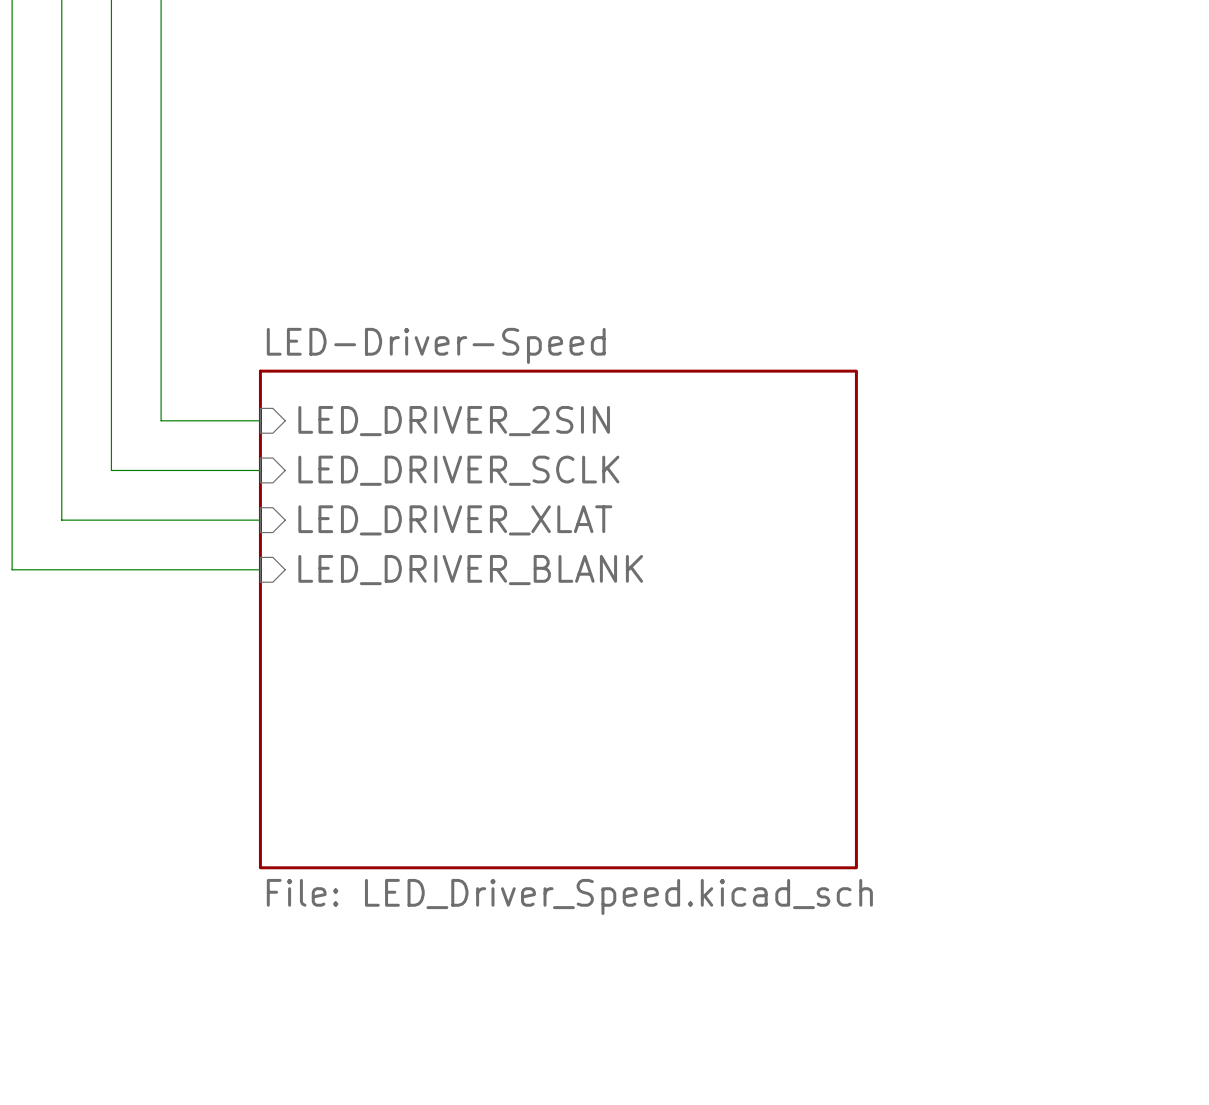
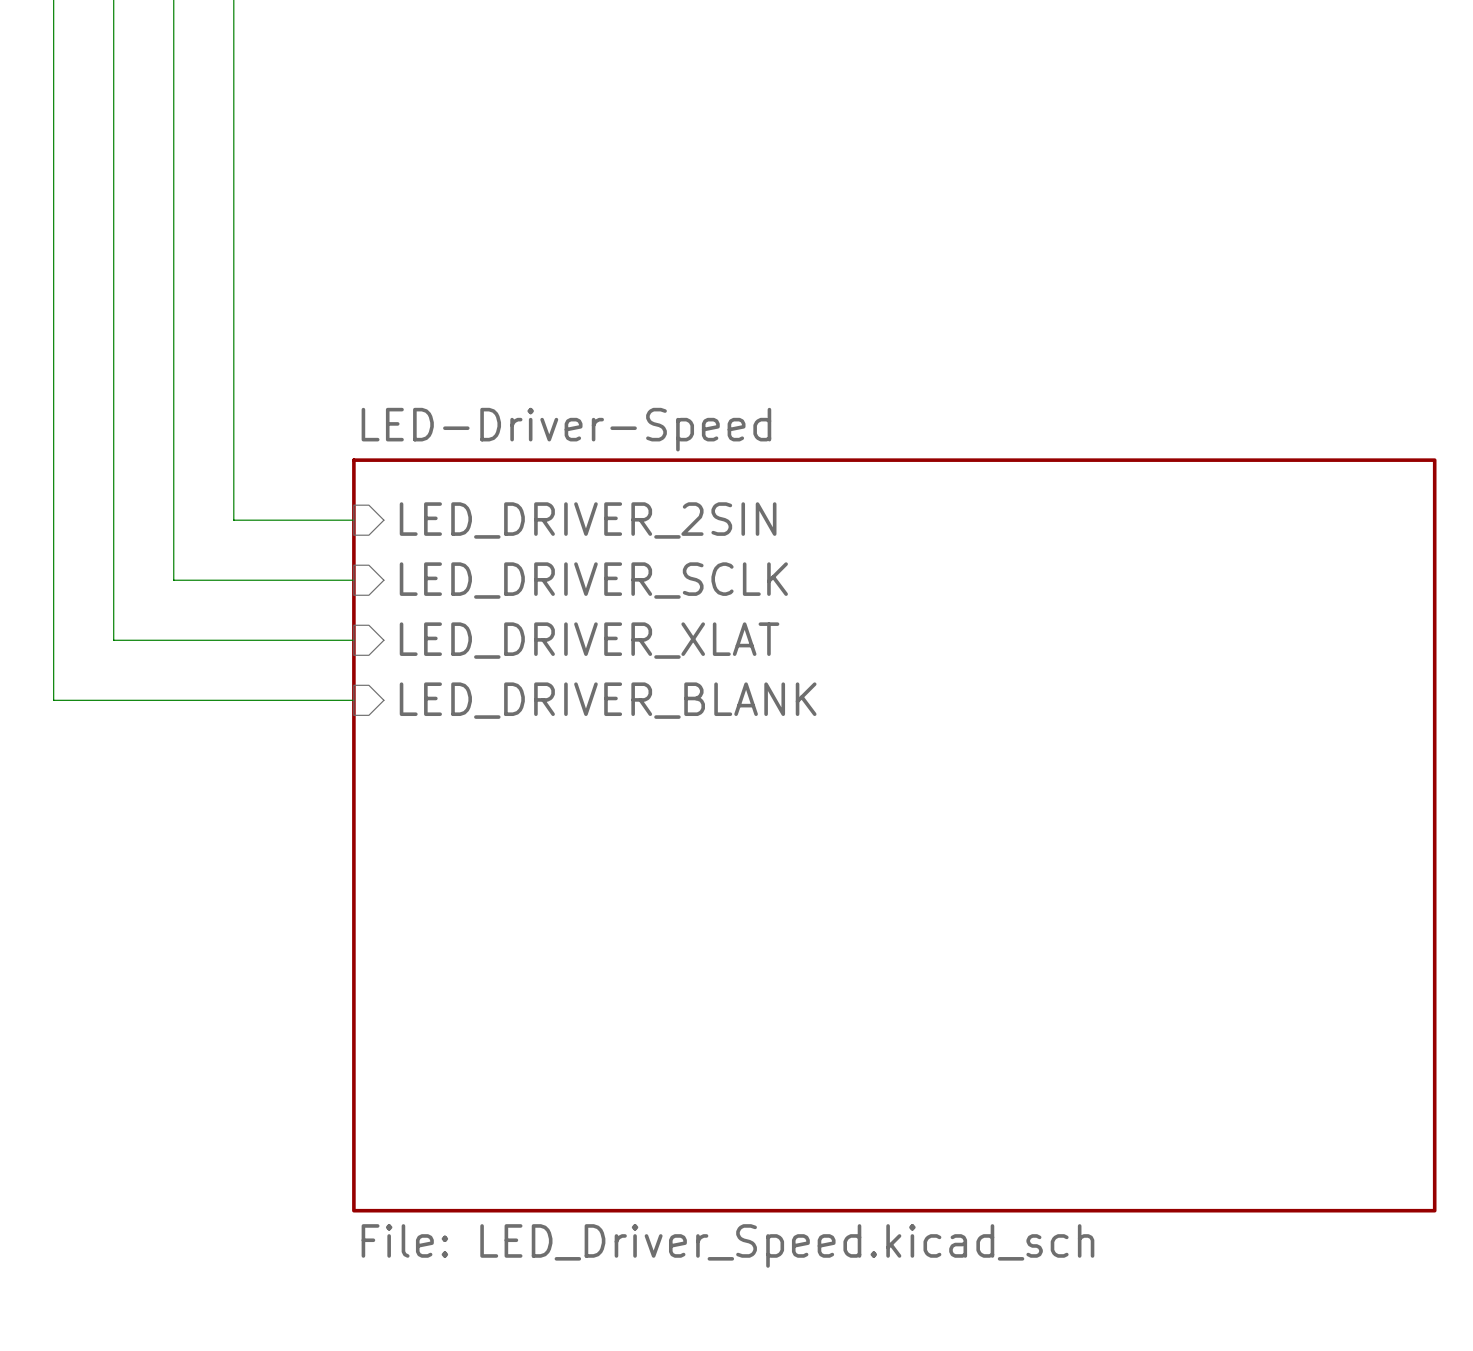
sheet LED-Driver-Speed: File: LED_Driver_Speed.kicad_sch (558, 619) -> none
sheet LED-Driver-Speed: none -> File: LED_Driver_Speed.kicad_sch (894, 835)

